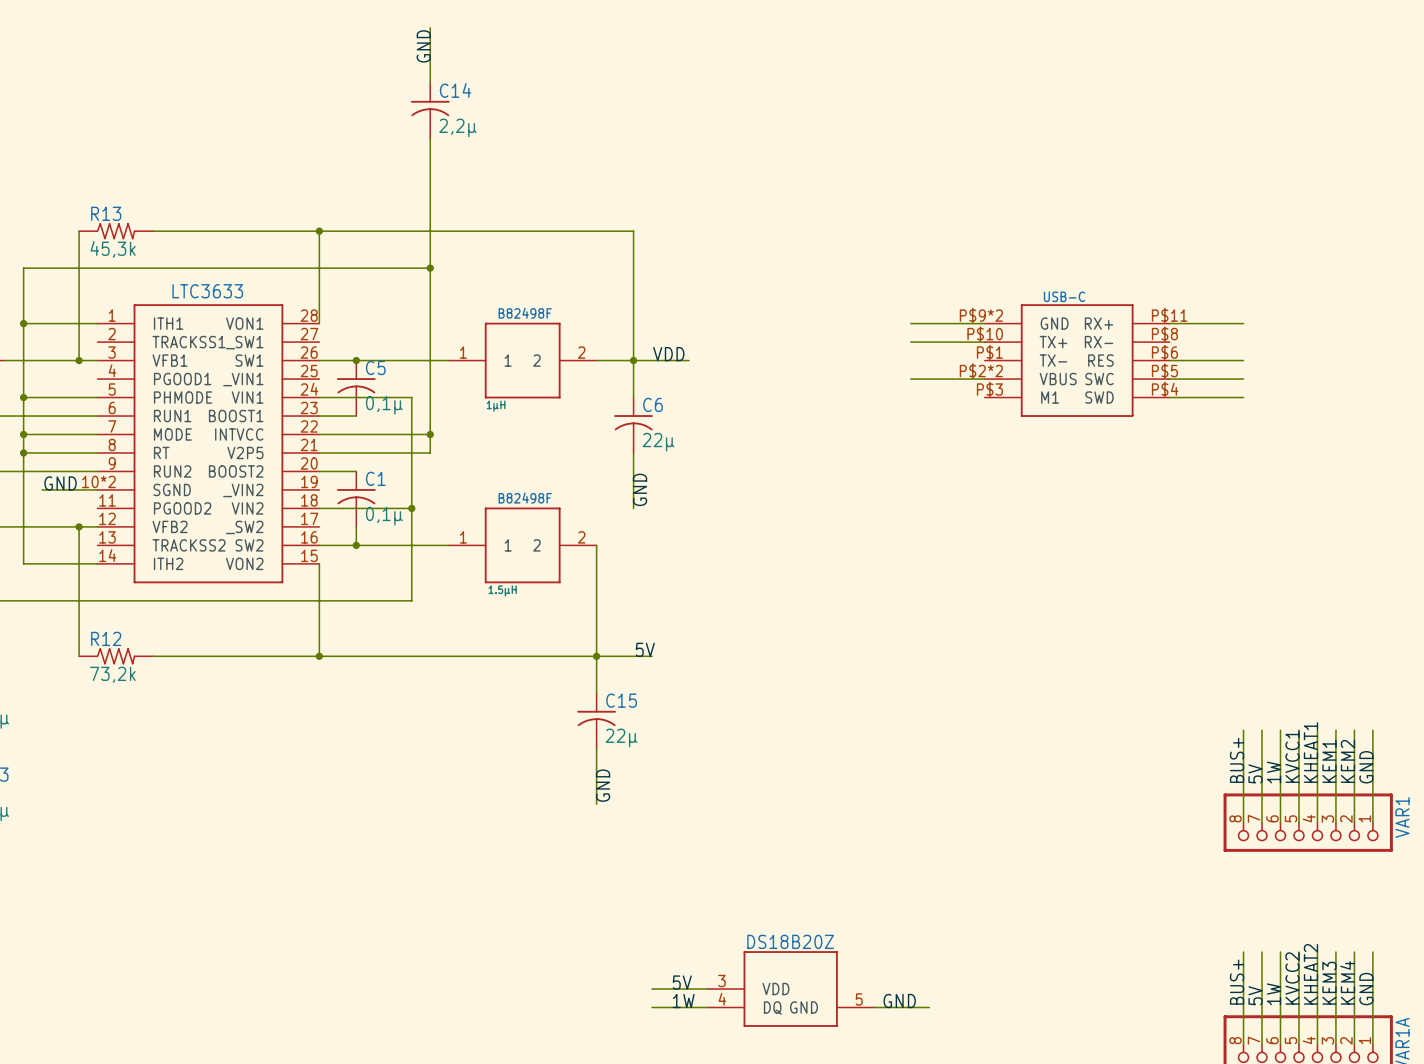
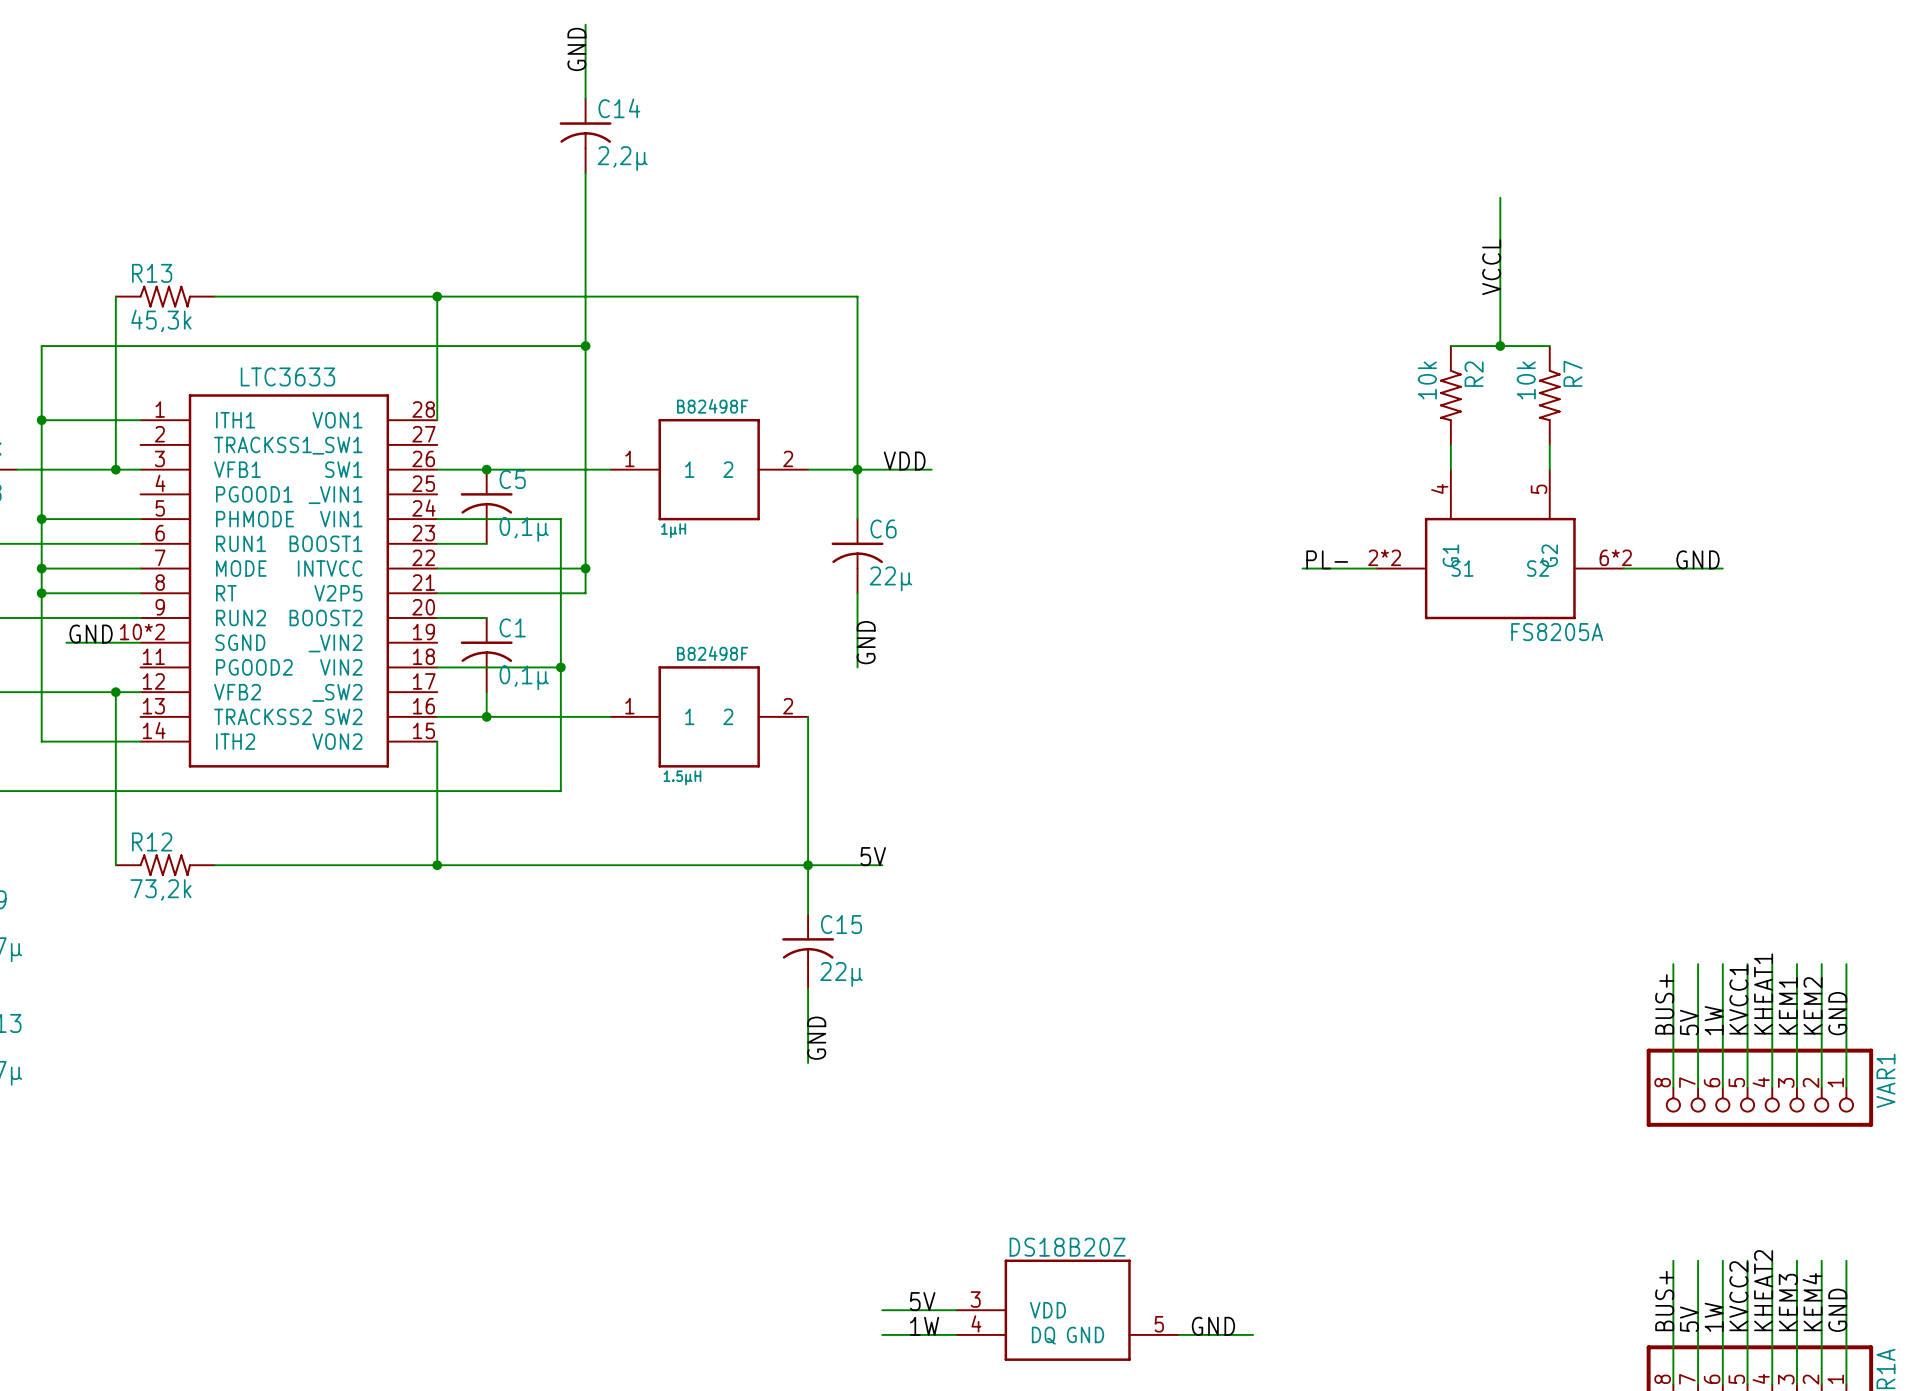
wire: none -> (1500, 197) (1500, 346)
label: none -> VCCL (1491, 267)
junction: none -> (1500, 346)
R2: none -> 10k (1450, 395)
R7: none -> 10k (1549, 395)
wire: (910, 323) (984, 323) -> none
wire: (1169, 323) (1243, 323) -> (1450, 346) (1549, 346)
wire: (910, 342) (984, 342) -> none
wire: none -> (1450, 444) (1450, 469)
wire: none -> (1549, 444) (1549, 469)
part: (1077, 360) -> none
wire: (1169, 360) (1243, 360) -> none
wire: (910, 379) (984, 379) -> none
wire: (1169, 379) (1243, 379) -> none
wire: (1169, 397) (1243, 397) -> (1623, 568) (1722, 568)
part: none -> (1500, 544)
label: none -> PL- (1327, 559)
label: none -> GND (1698, 559)
wire: none -> (1302, 568) (1376, 568)

